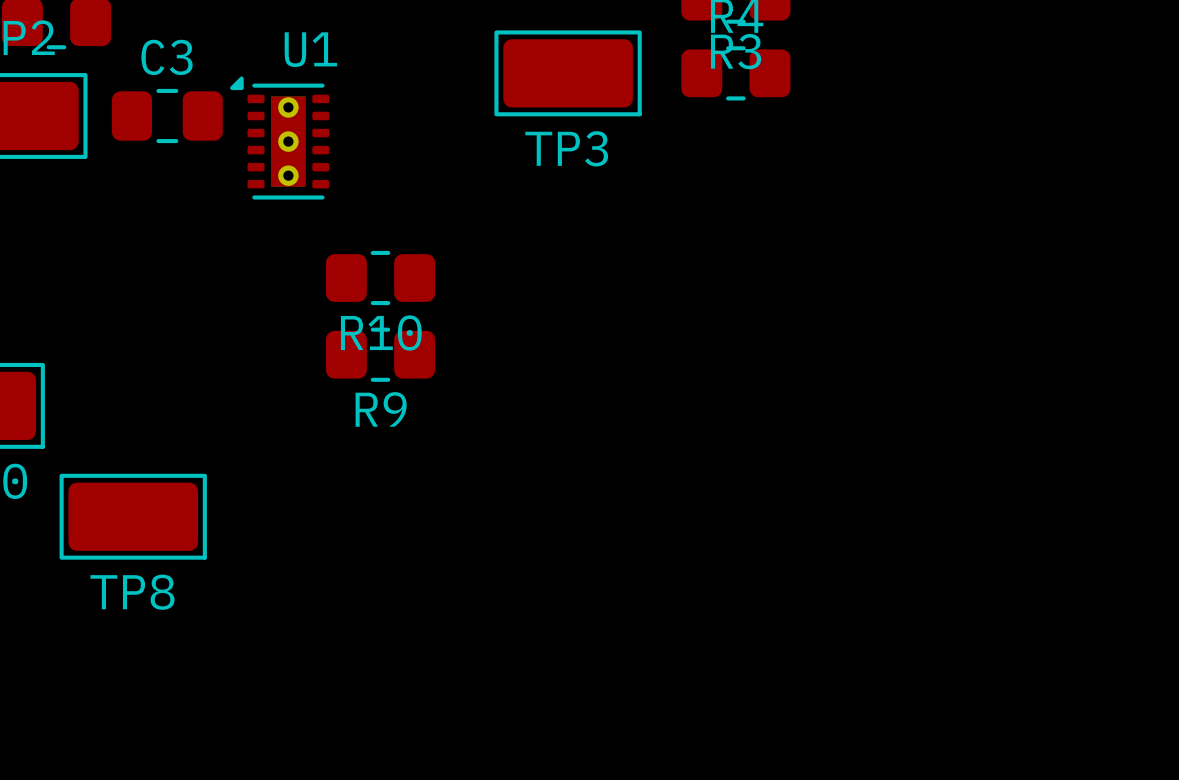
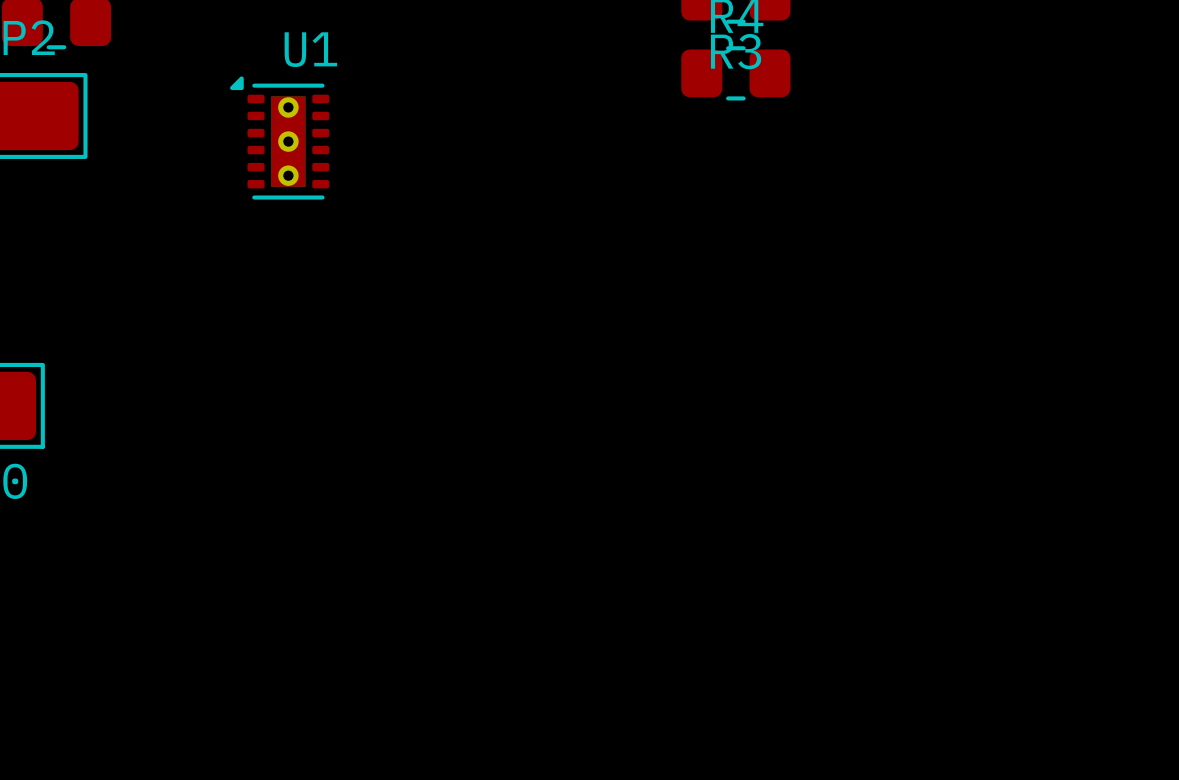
TP3: (568, 73) -> none
C3: (167, 115) -> none
R10: (380, 277) -> none
R9: (380, 354) -> none
TP8: (133, 516) -> none

